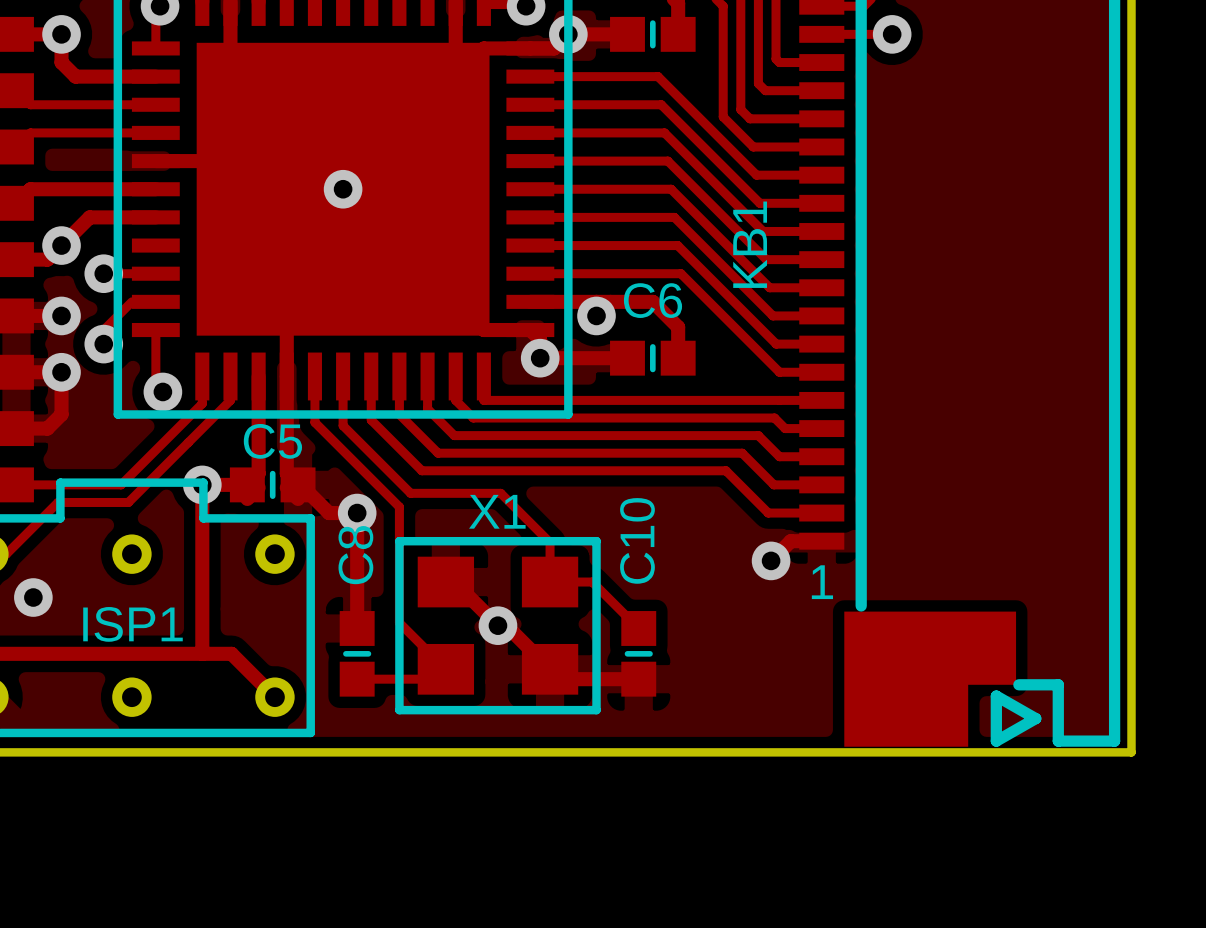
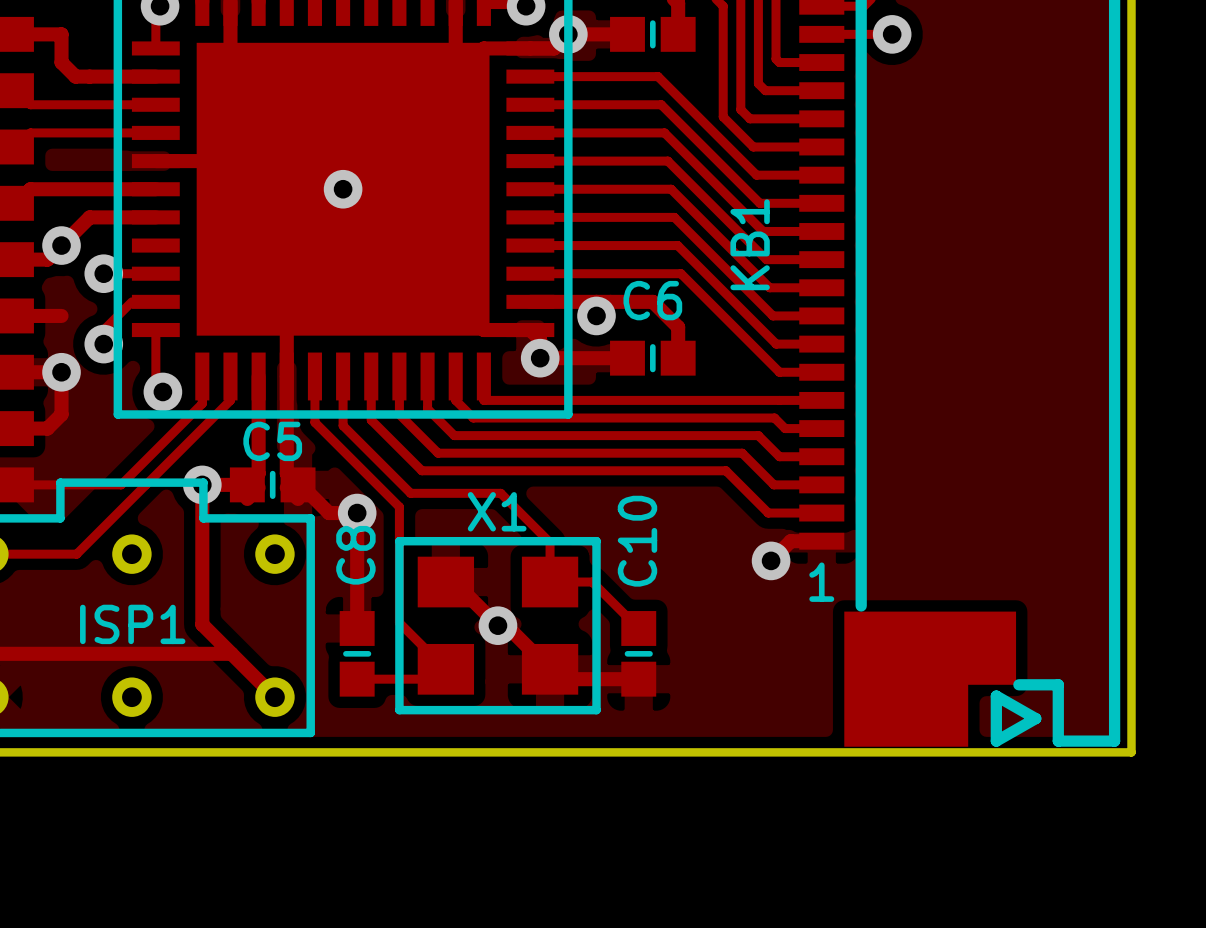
via: (61, 34) -> none
via: (61, 315) -> none
track: (128, 502) (58, 502) (6, 554) -> (128, 502) (76, 554) (6, 554)
via: (33, 597) -> none
track: (202, 624) (202, 653) -> (202, 624) (231, 653)

